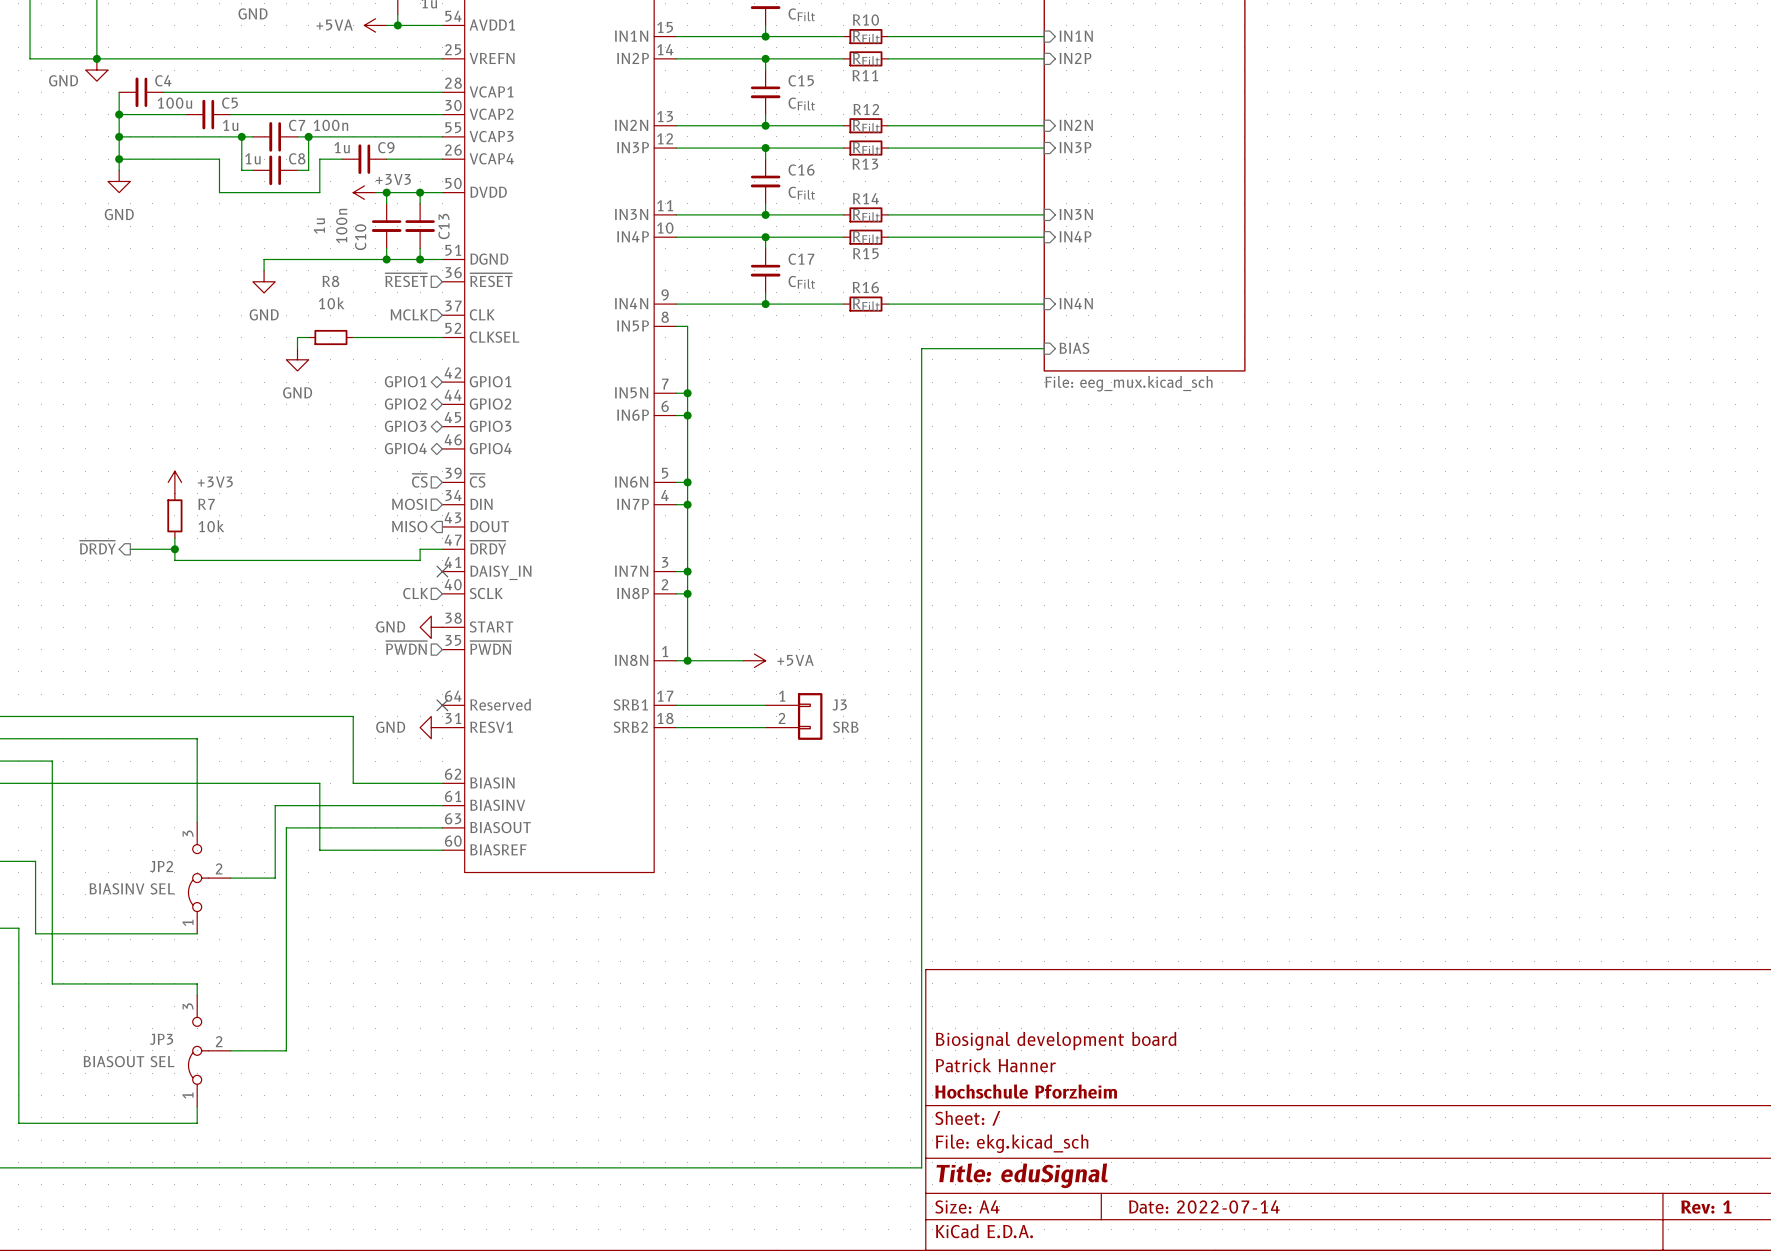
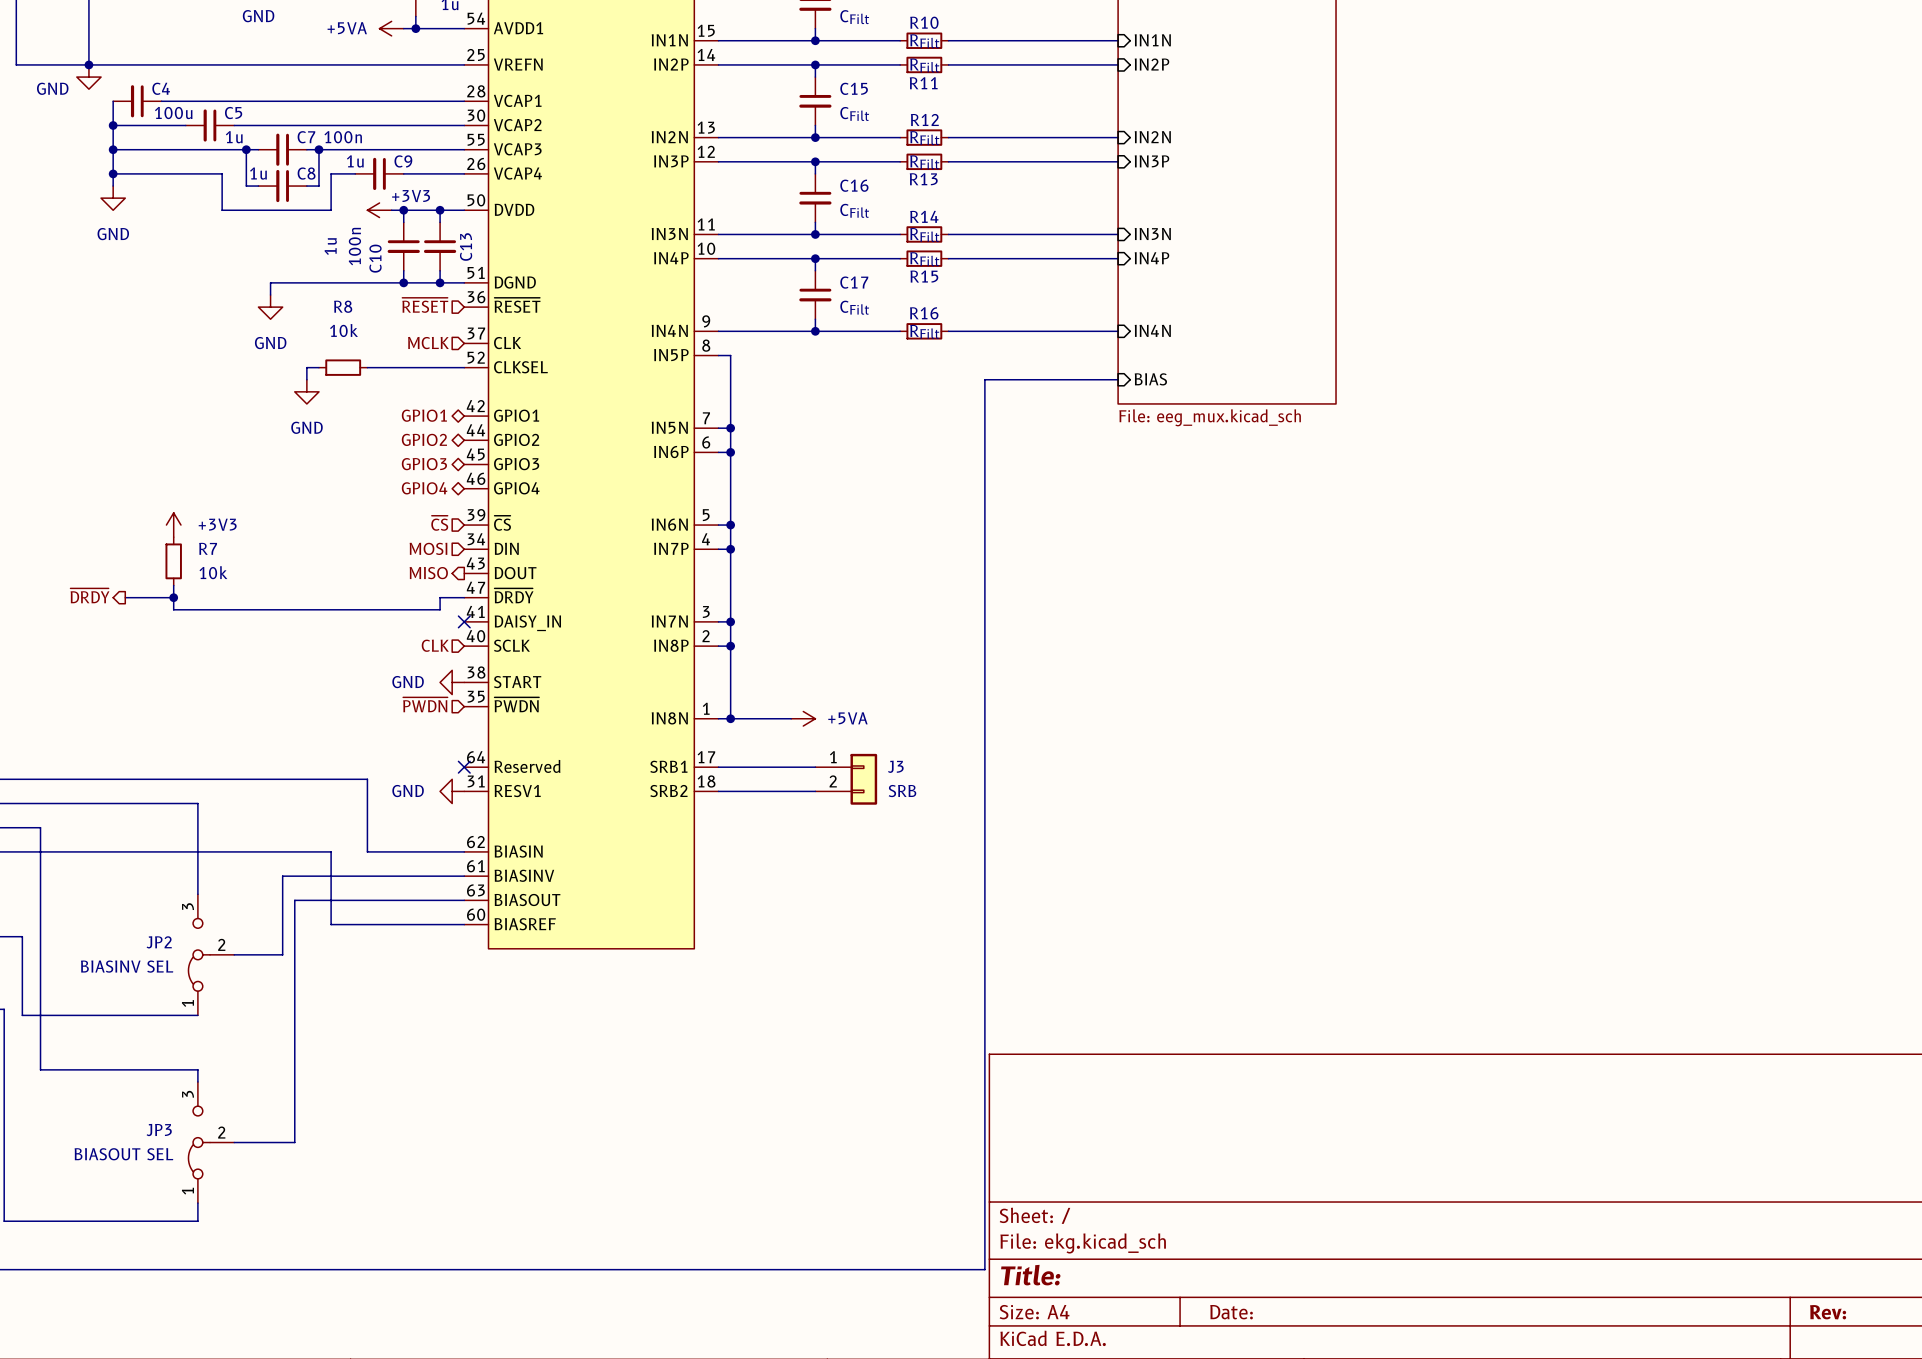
title block: Biosignal development board (1056, 1041) -> none
title block: Patrick Hanner (995, 1065) -> none
title block: Hochschule Pforzheim (1026, 1091) -> none
title block: Title: eduSignal (1022, 1175) -> Title: (1030, 1275)
title block: Date: 2022-07-14 (1204, 1206) -> Date: (1231, 1312)
title block: Rev: 1 (1706, 1207) -> Rev: (1828, 1312)

